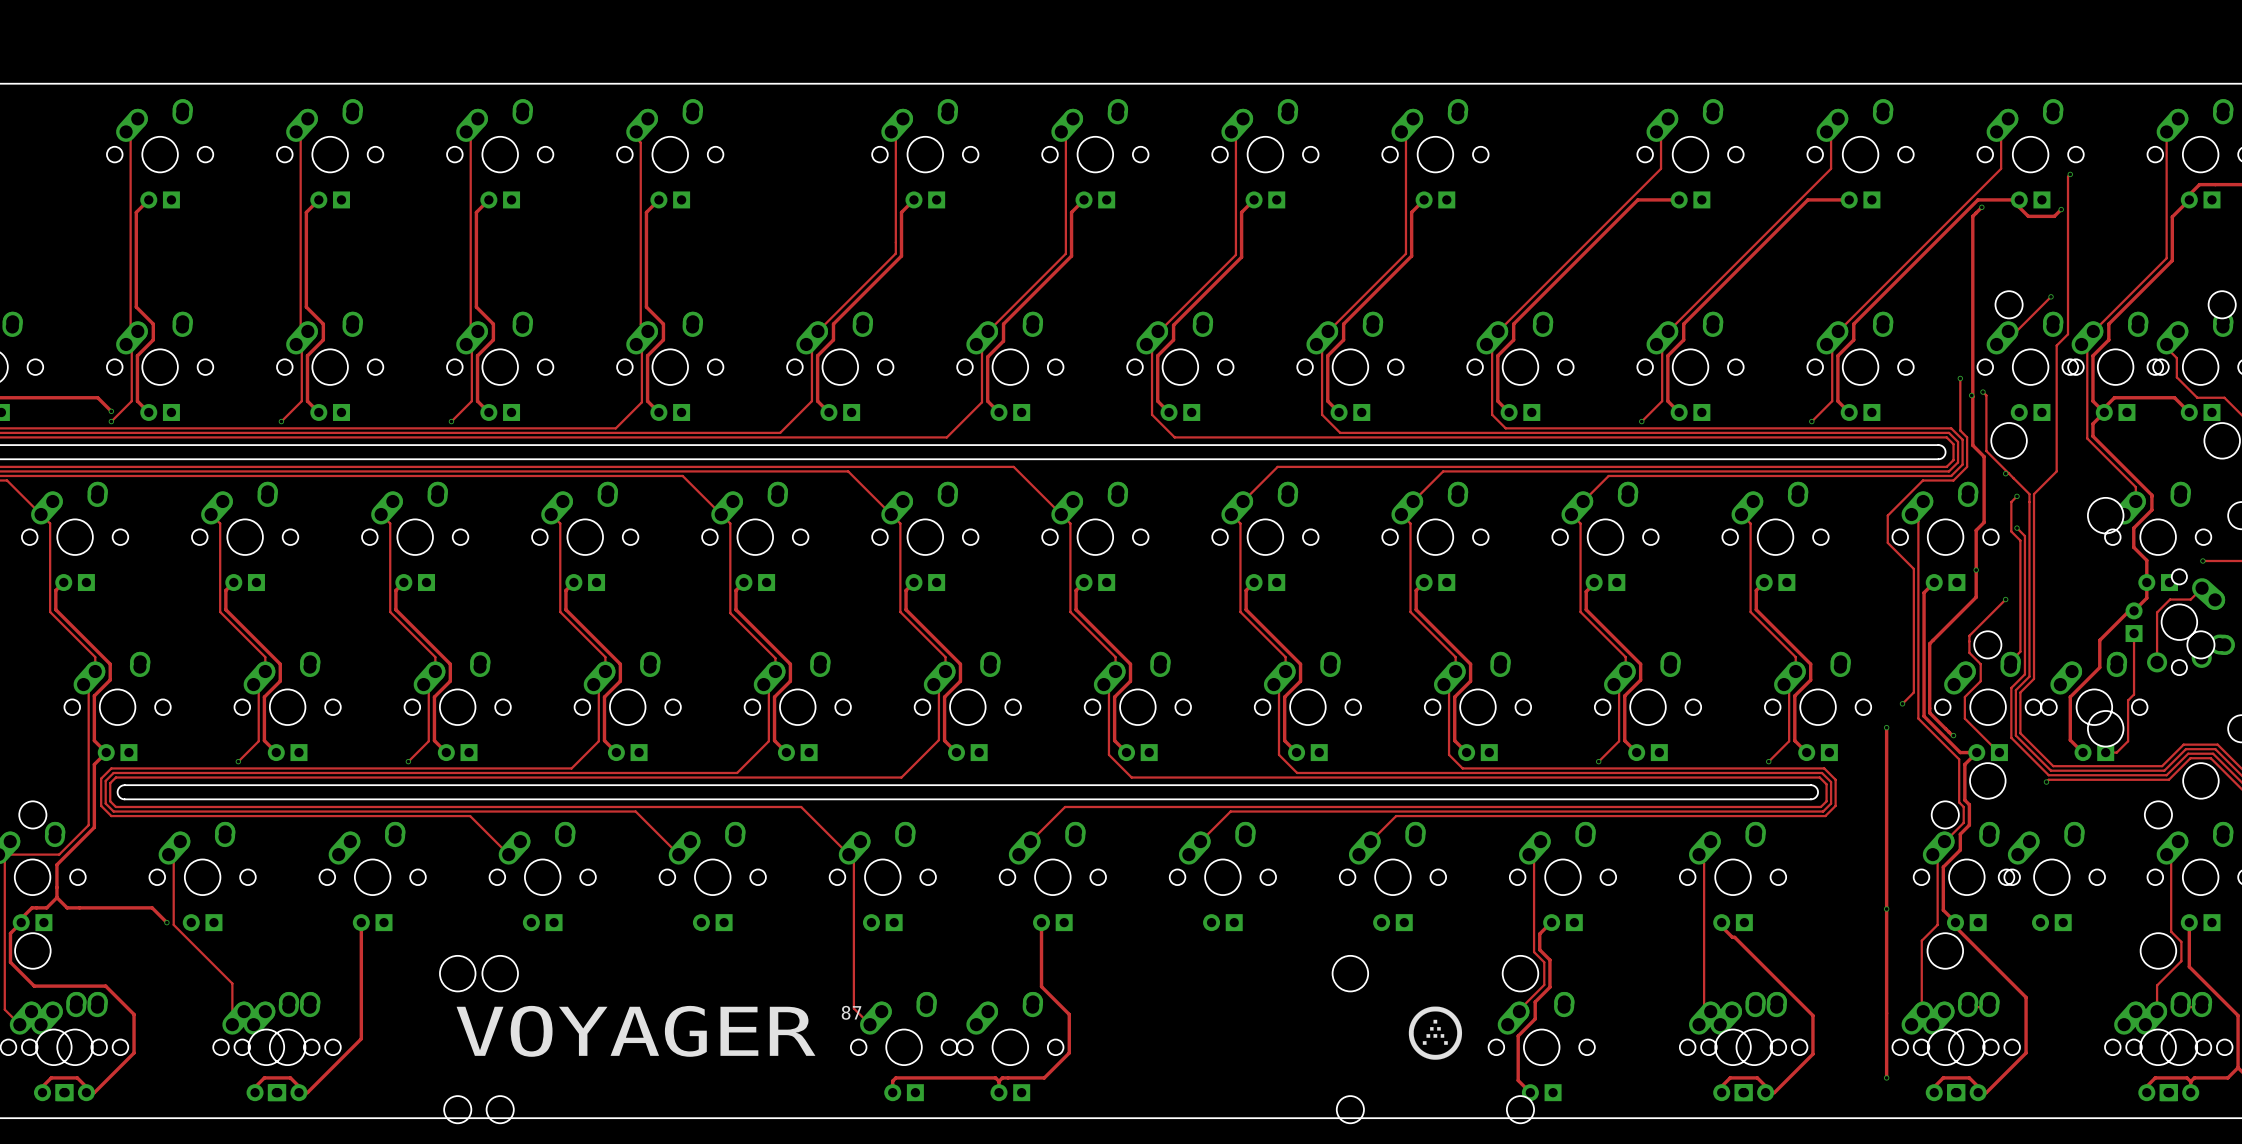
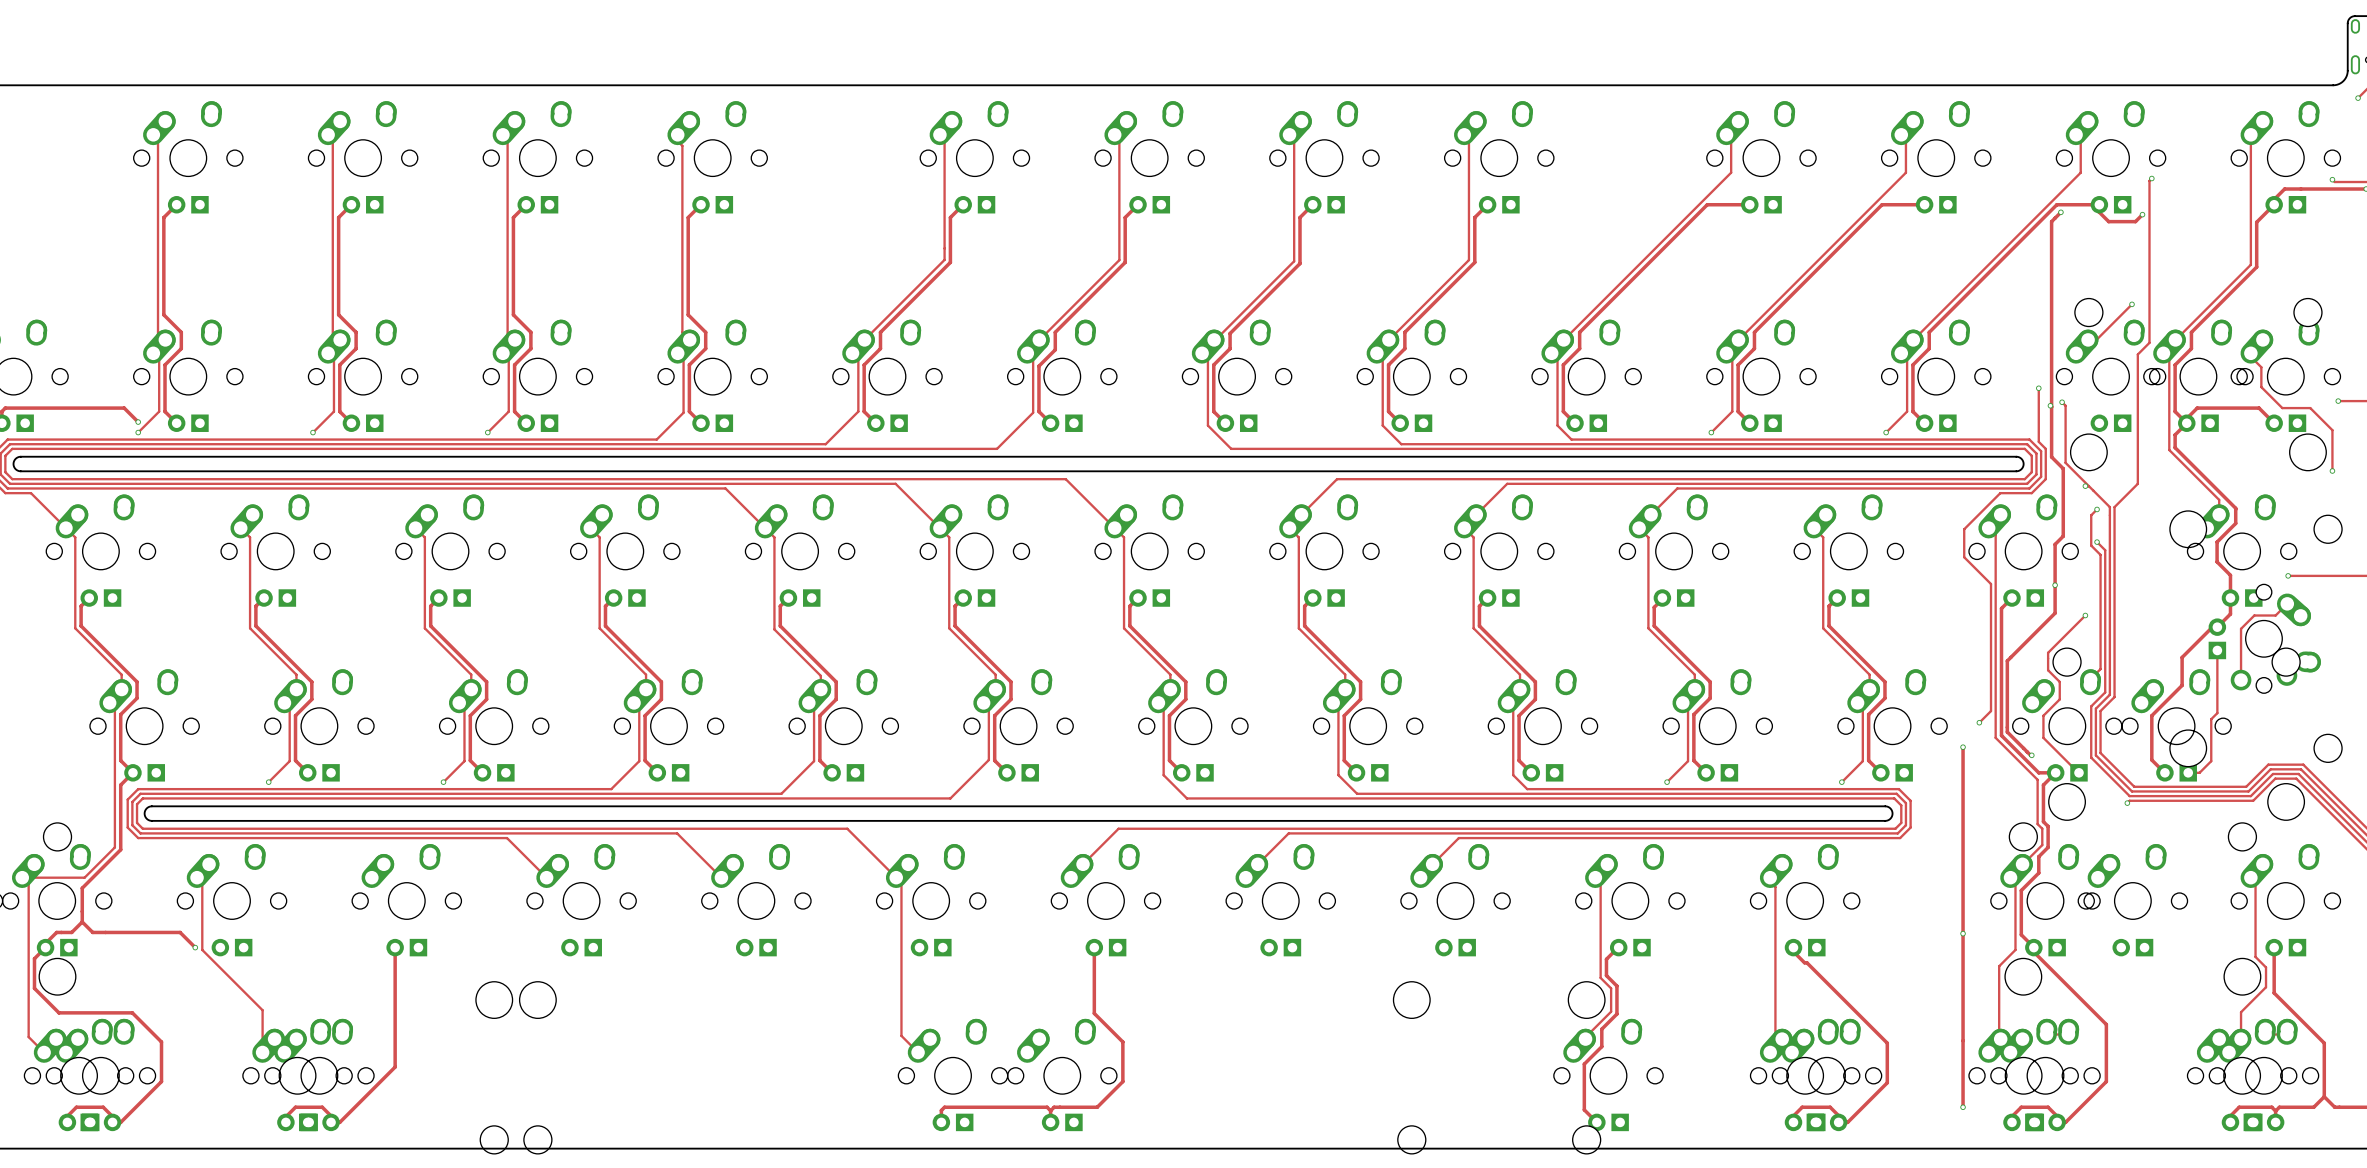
drawing: [1408, 1006, 1463, 1060] -> none
text: 87 (851, 1012) -> none
text: VOYAGER (636, 1031) -> none

